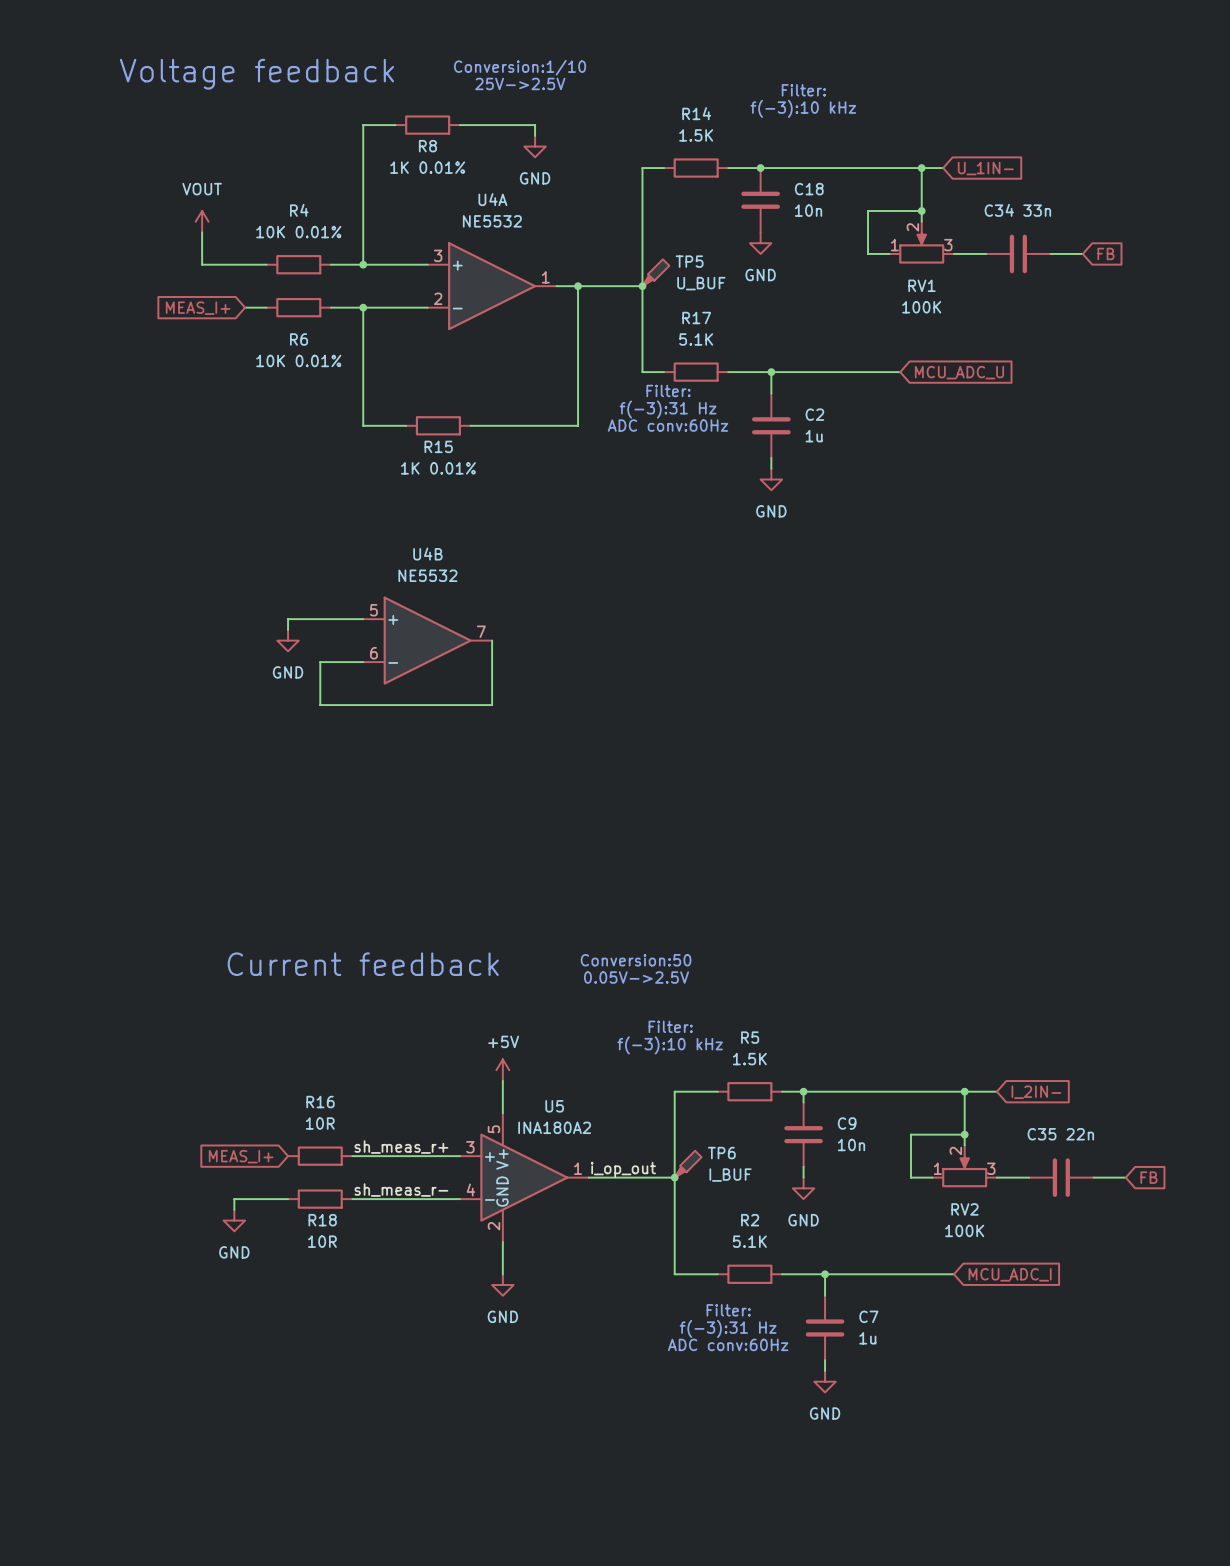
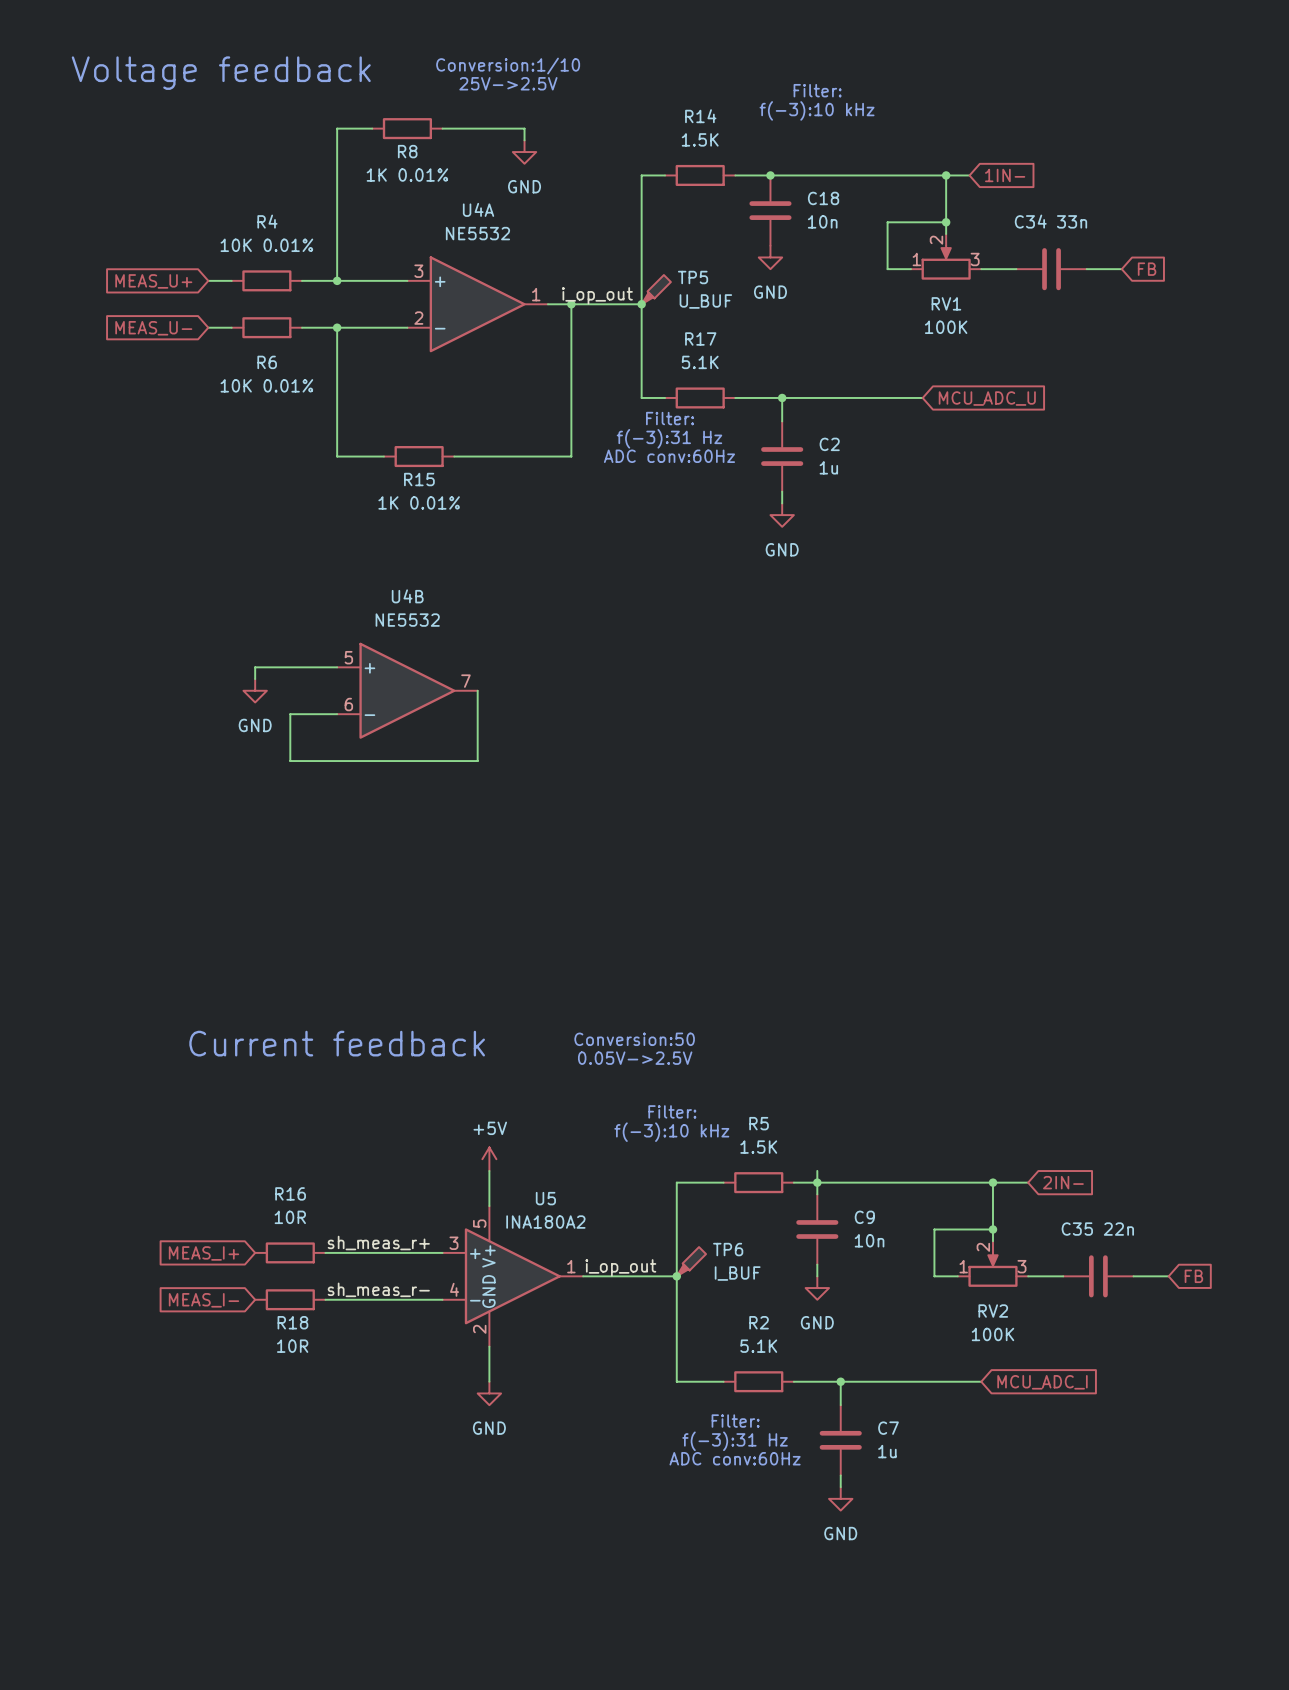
global label: U_1IN- (985, 168) -> 1IN- (1005, 175)
power symbol: VOUT (202, 221) -> none
wire: (202, 232) (202, 264) (245, 264) -> none
global label: none -> MEAS_U+ (153, 281)
label: none -> i_op_out (597, 295)
global label: MEAS_I+ (198, 308) -> MEAS_U- (153, 328)
wire: none -> (817, 1170) (817, 1182)
global label: I_2IN- (1036, 1092) -> 2IN- (1063, 1182)
global label: none -> MEAS_I- (203, 1300)
wire: (288, 1199) (234, 1199) (234, 1209) -> none
power symbol: GND (234, 1220) -> none

